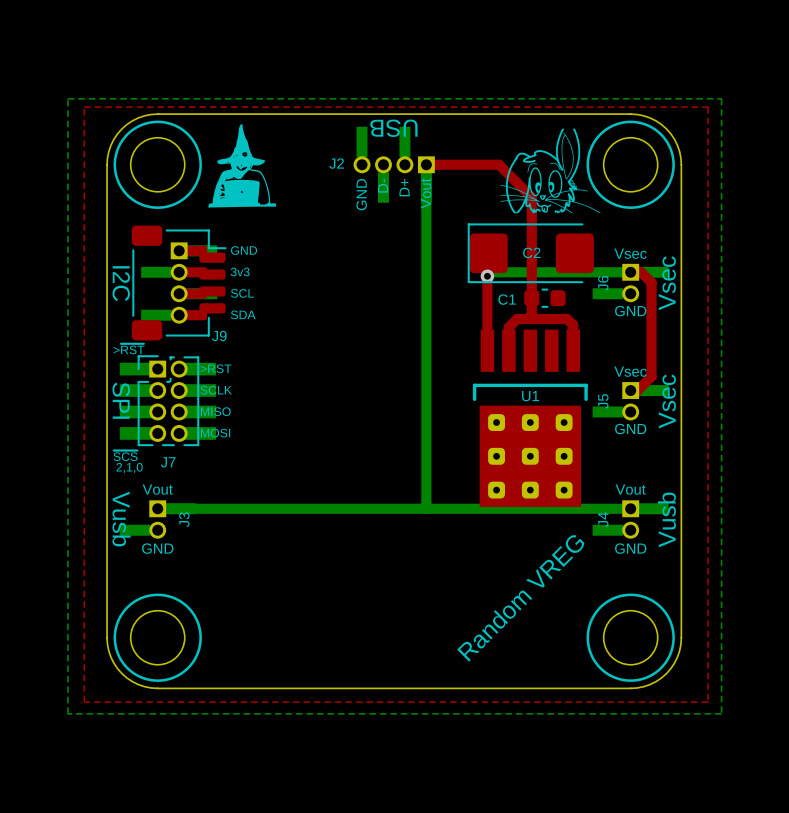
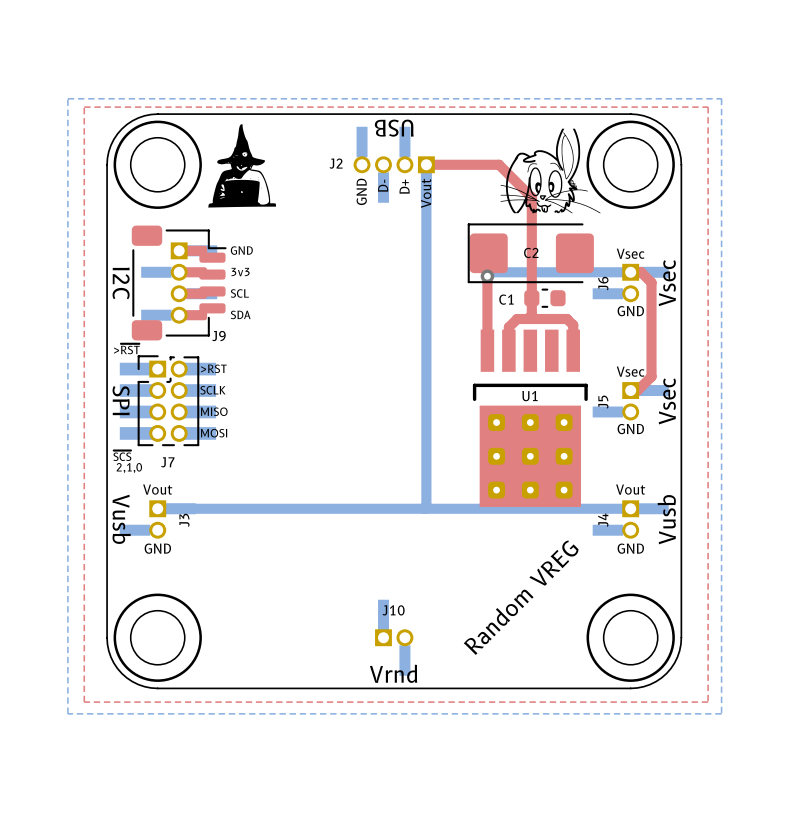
J10: none -> (394, 637)
text: none -> Vrnd (393, 673)

